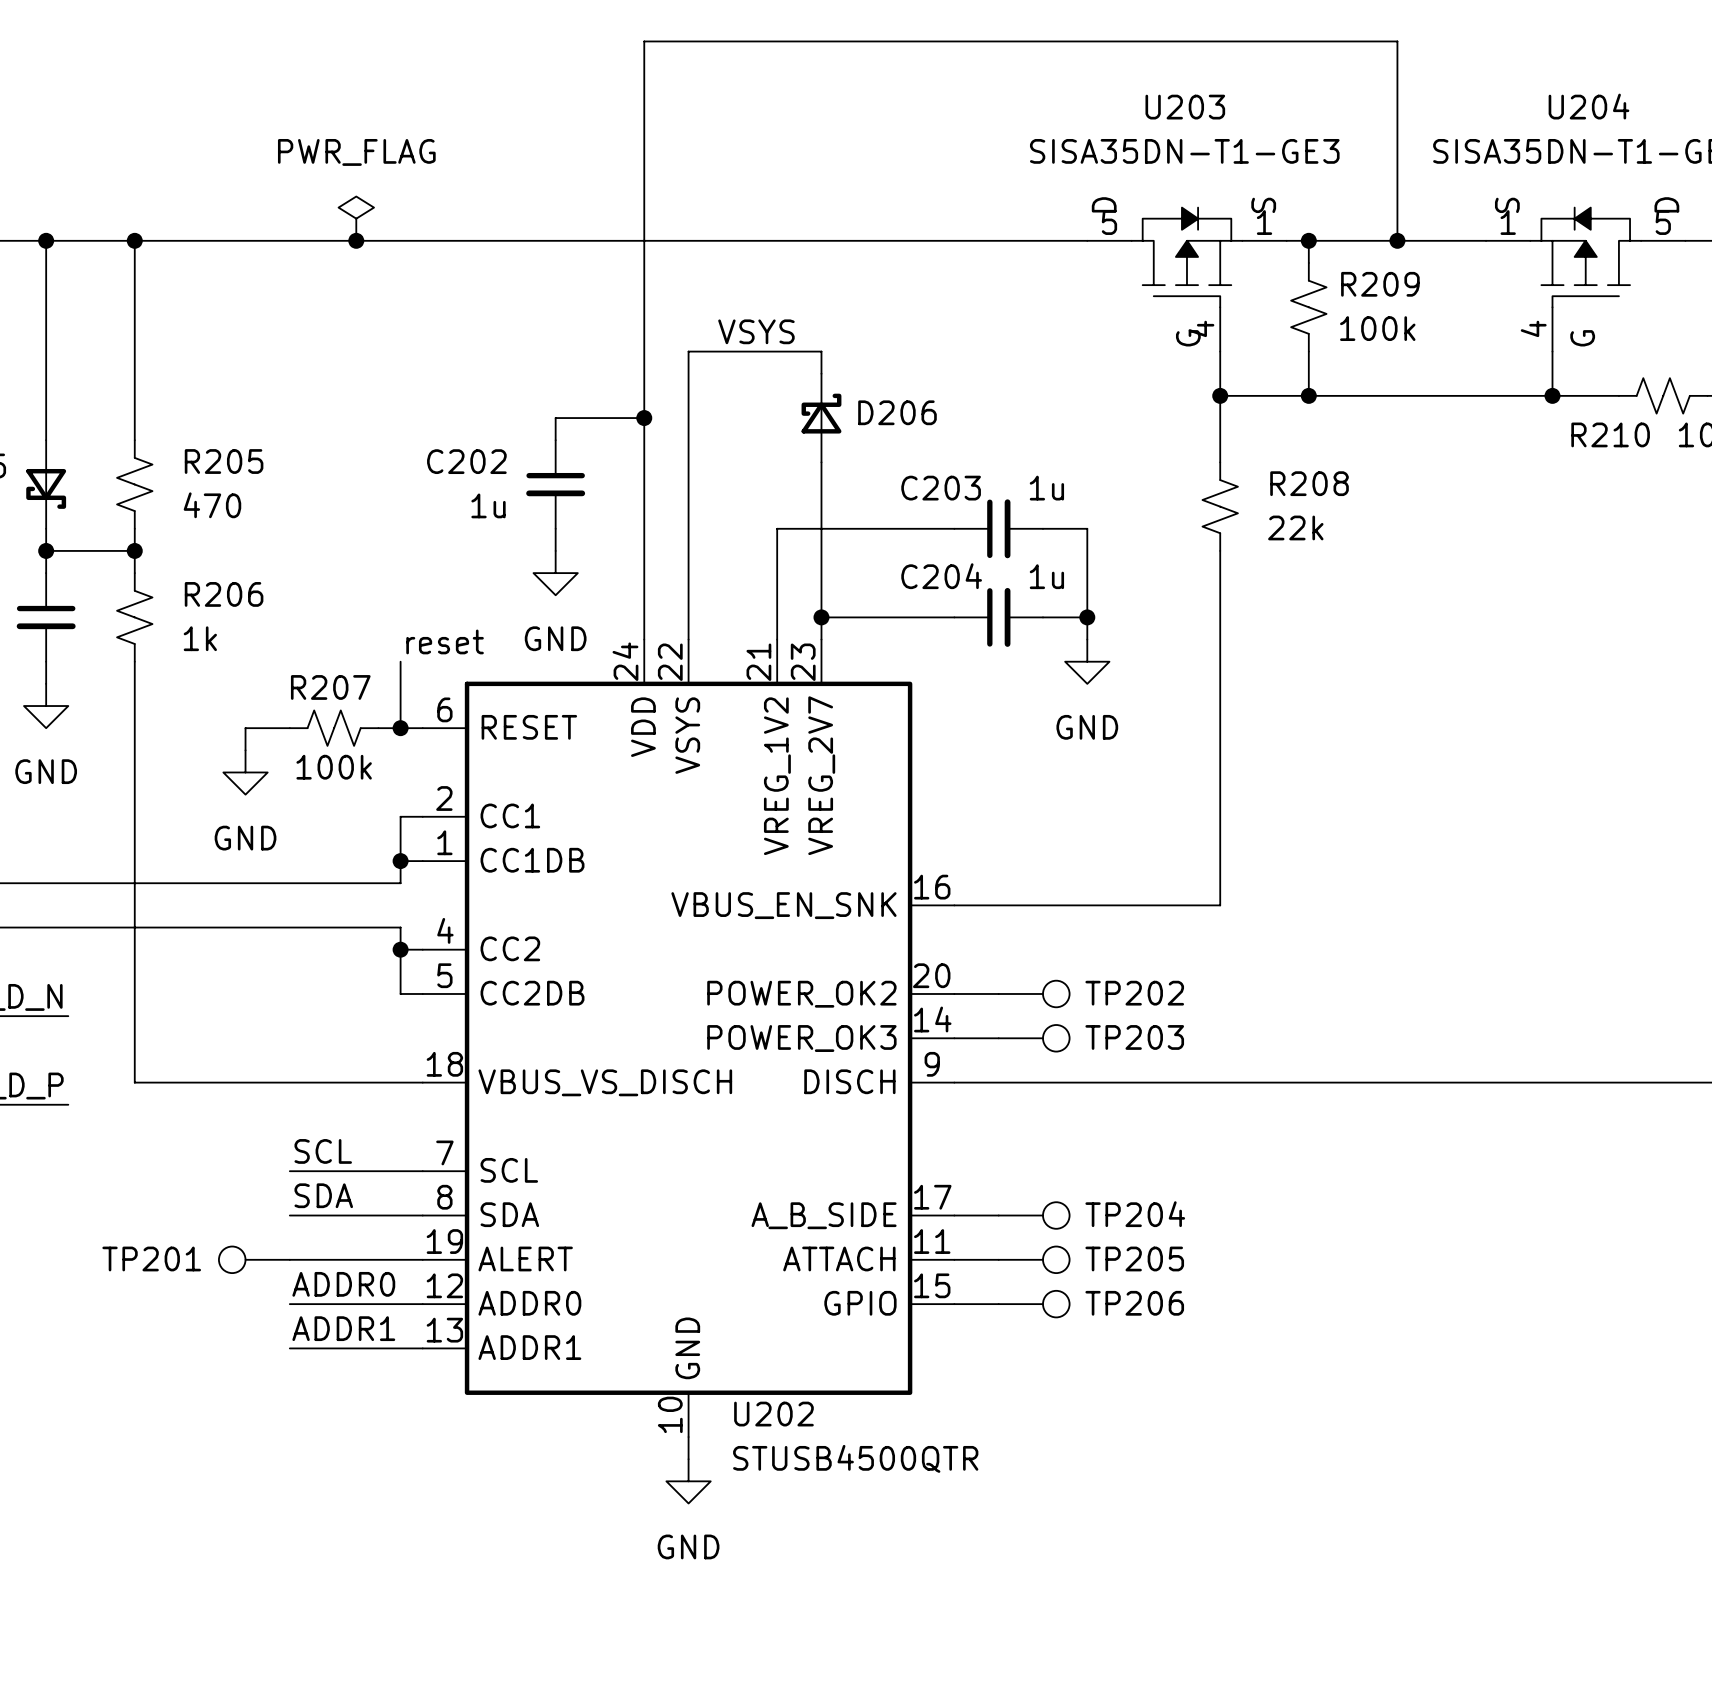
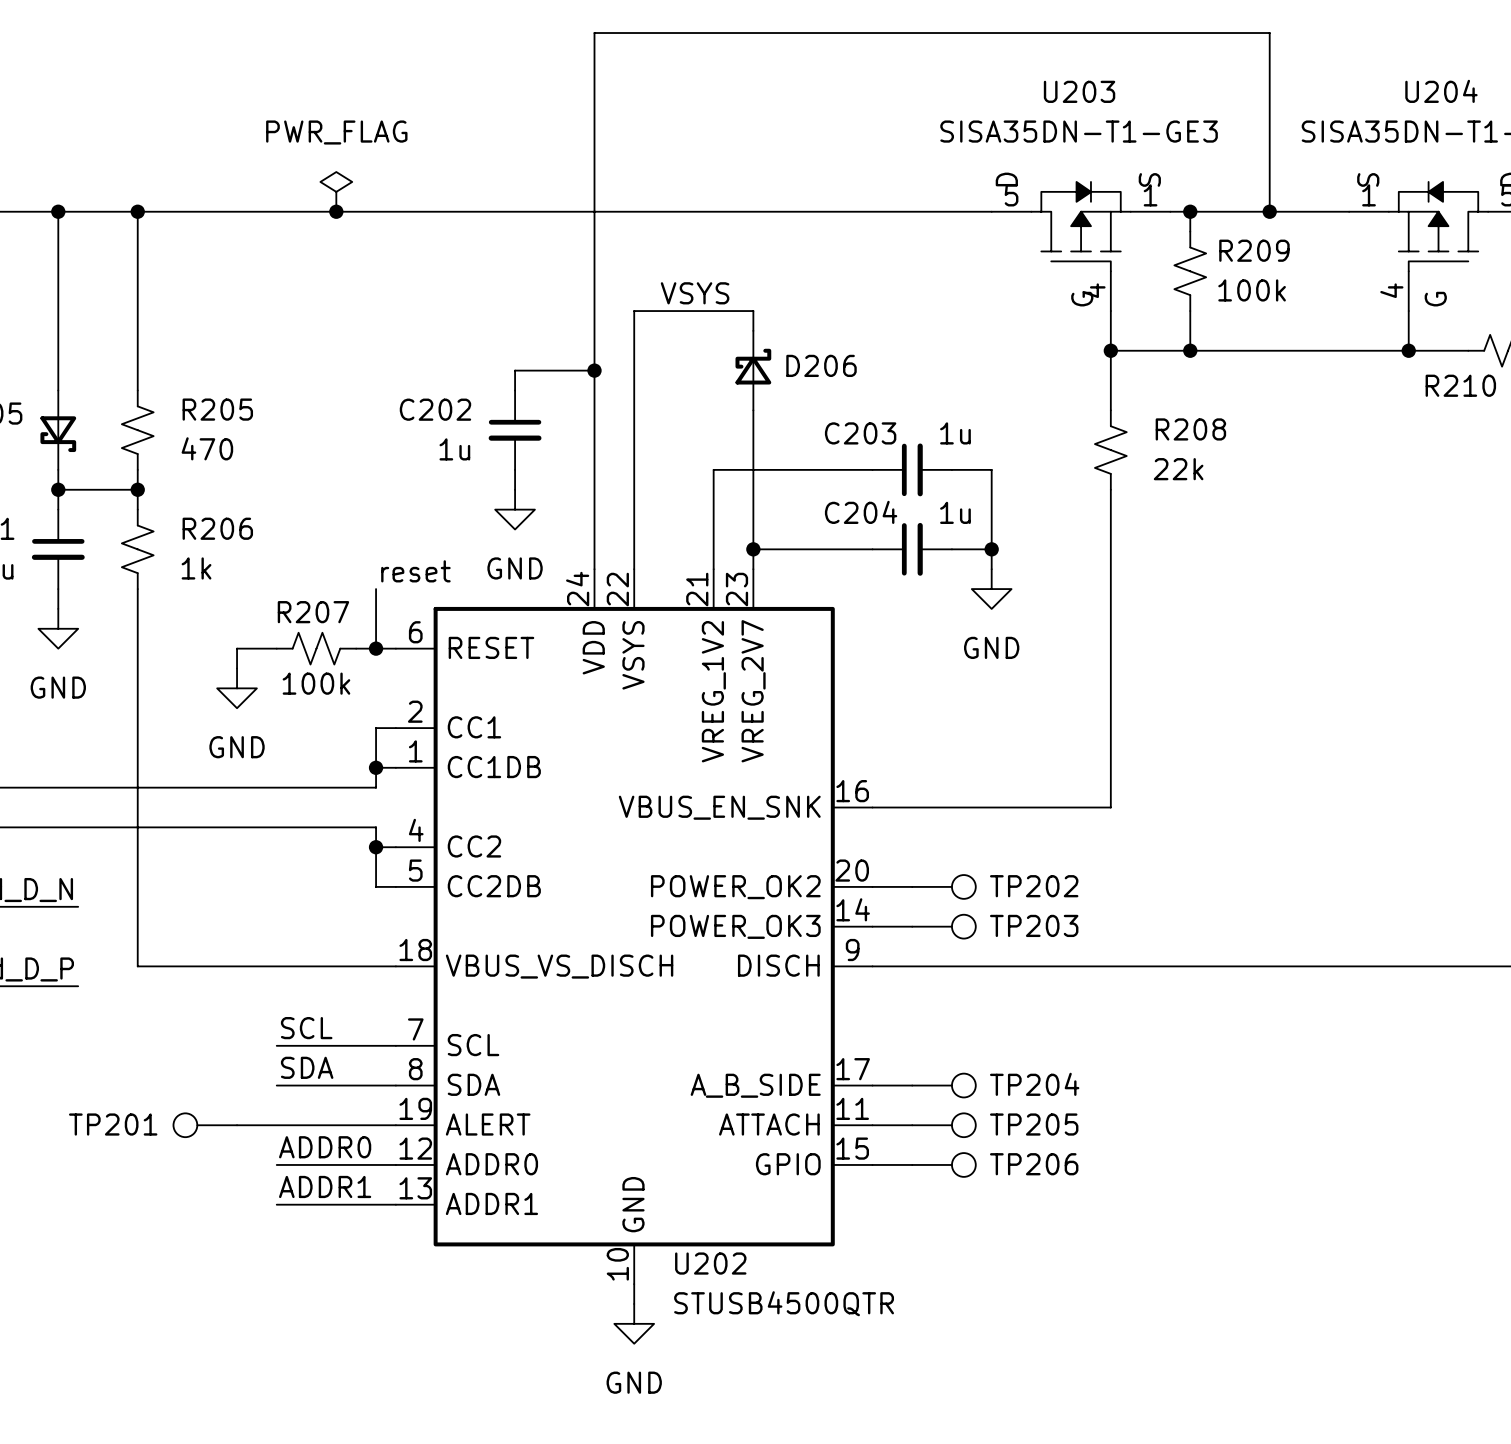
TP201 position: (254, 1259) -> (205, 1125)

